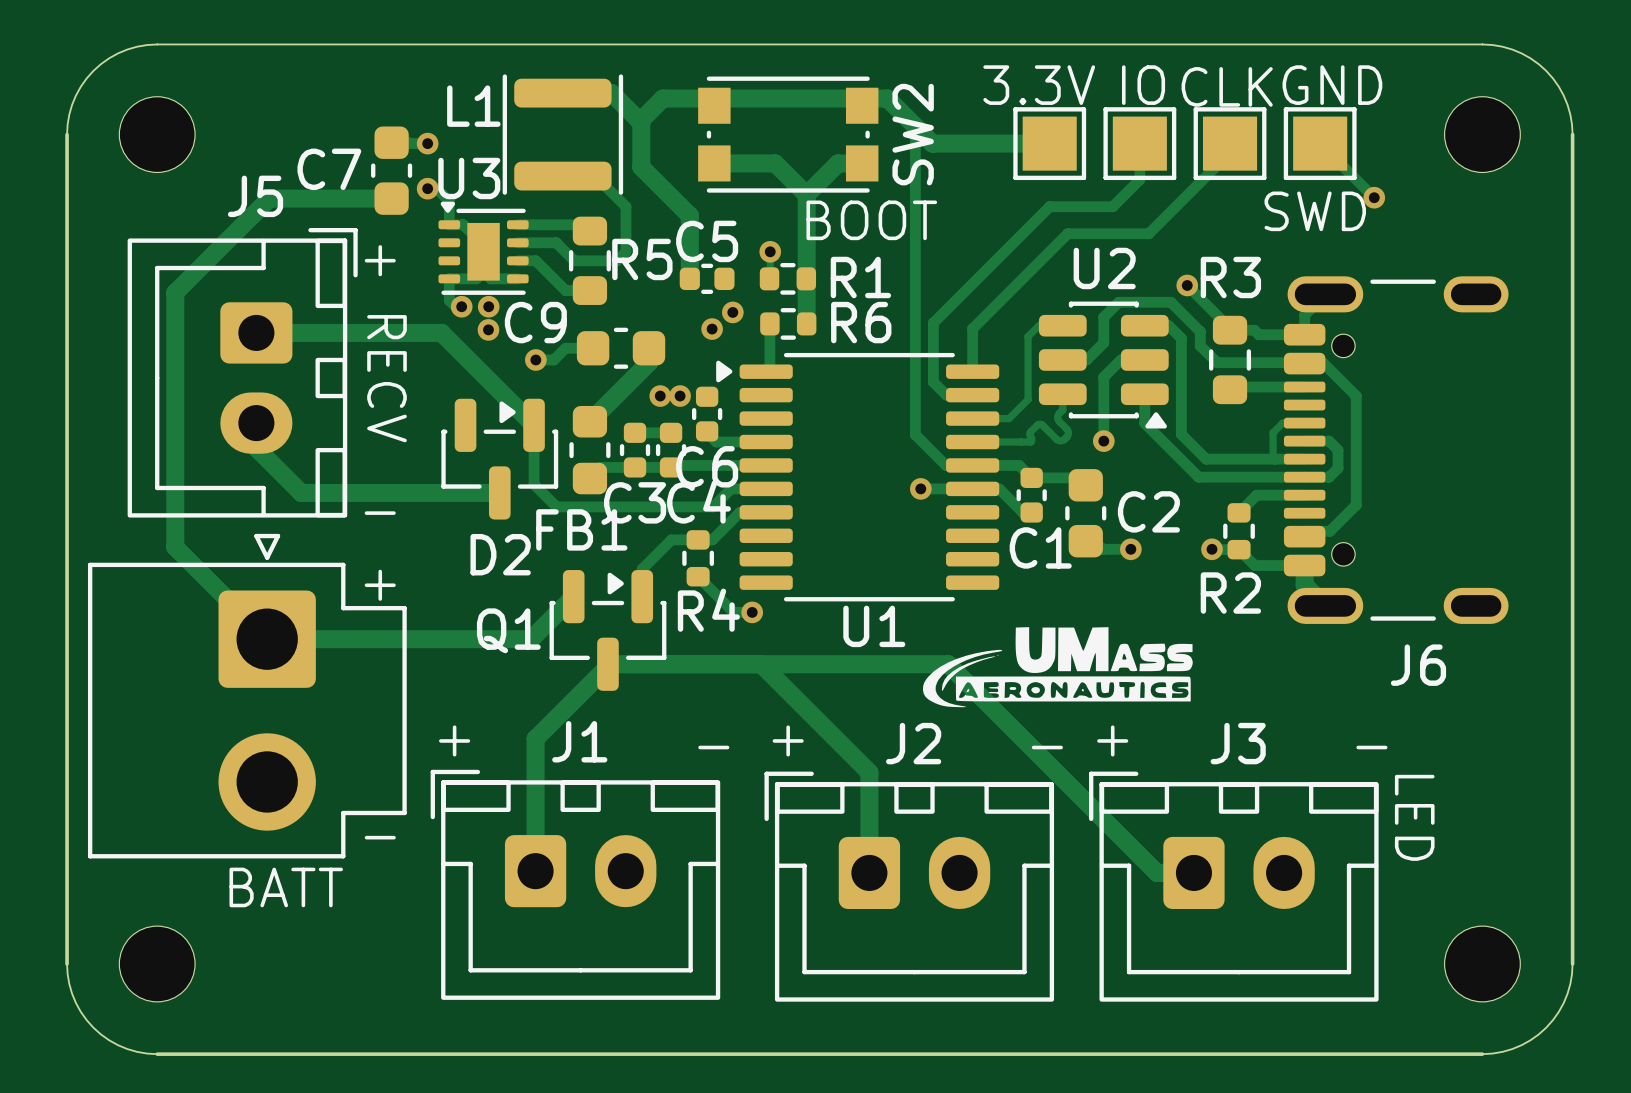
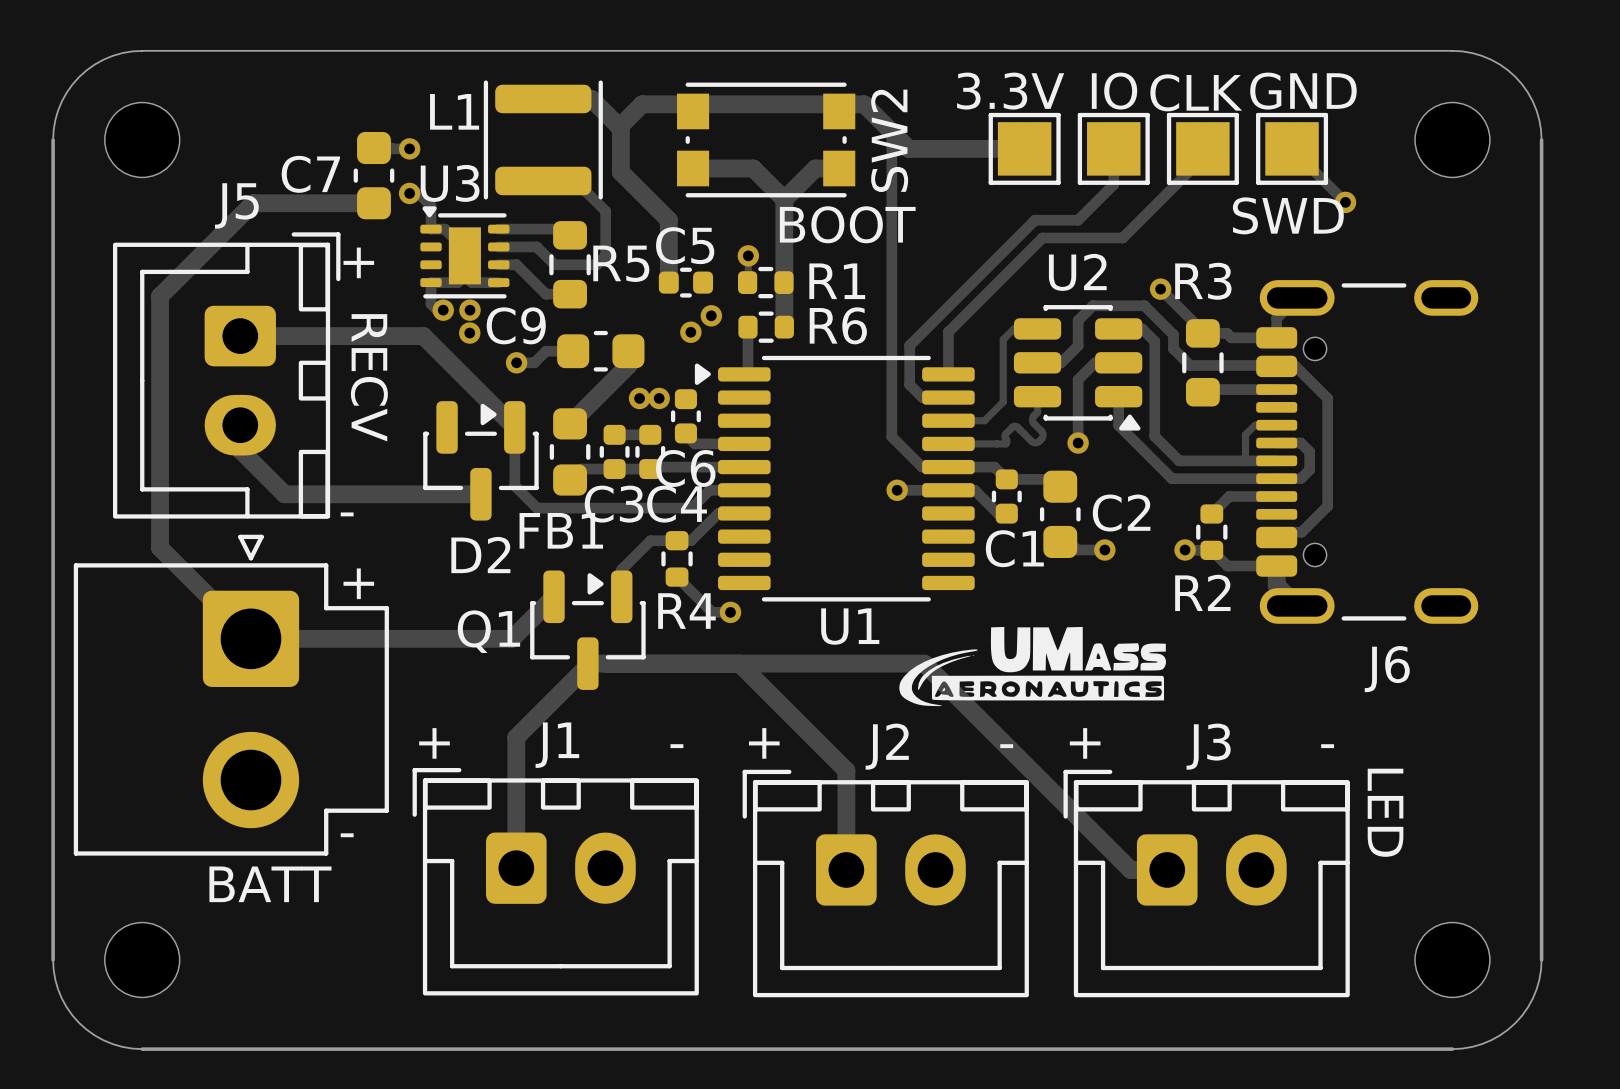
track: (1112, 206) (1049, 206) (933, 323) (933, 342) -> (1087, 211) (1078, 220) (1035, 220) (909, 345)

